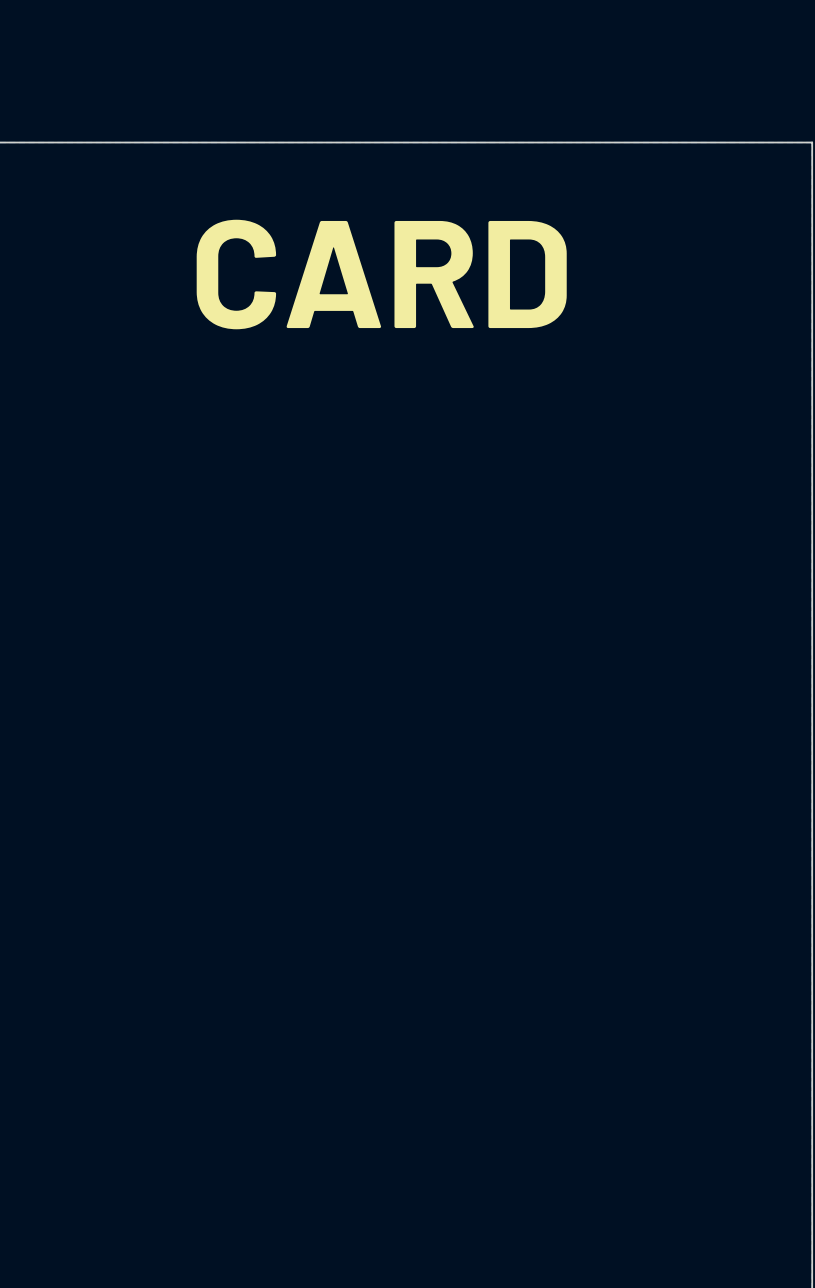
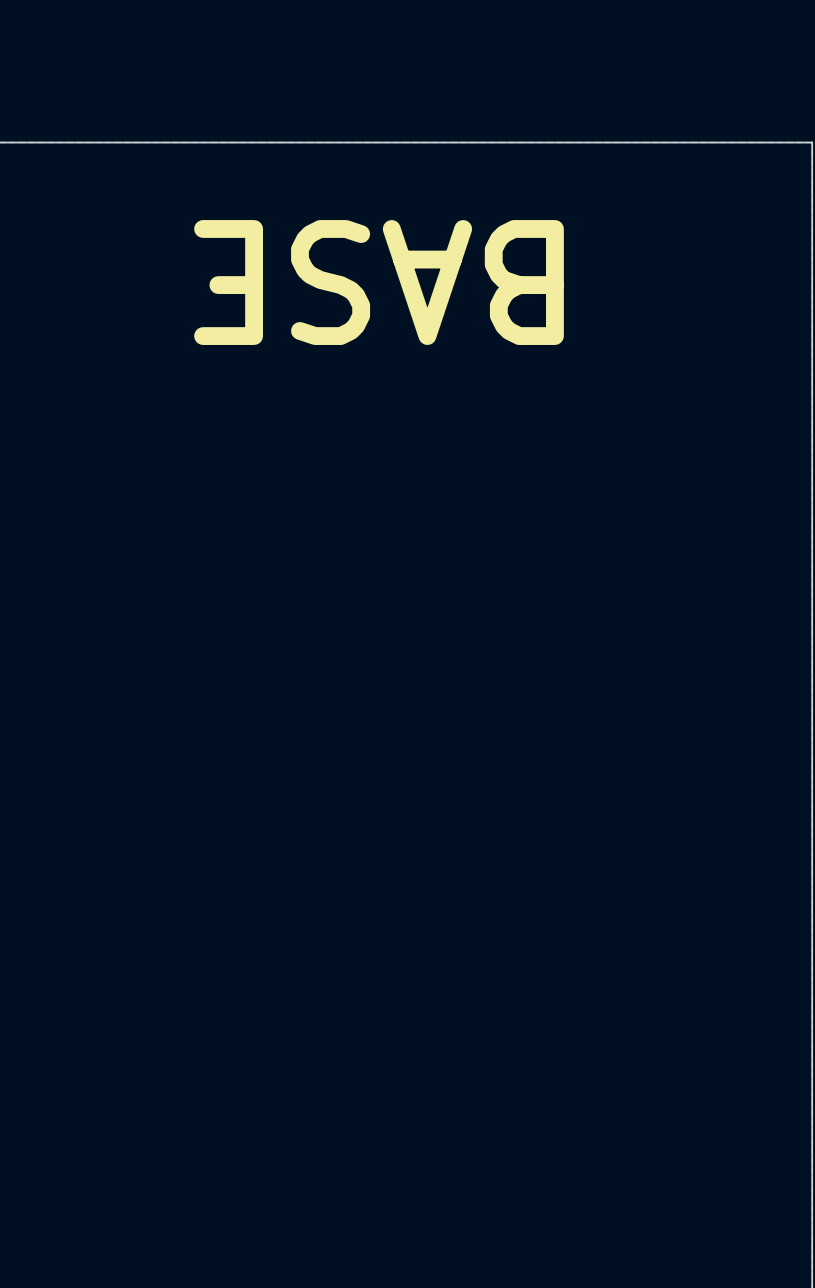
text: CARD (381, 274) -> BASE (379, 282)

